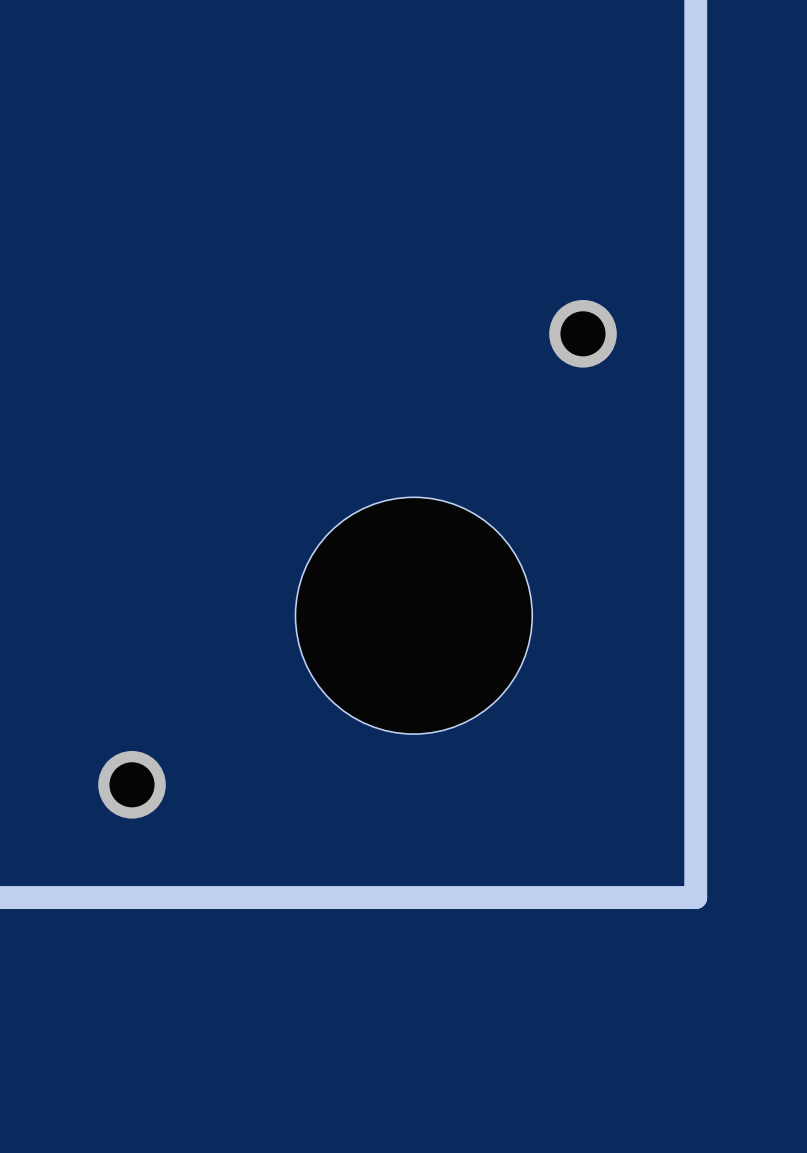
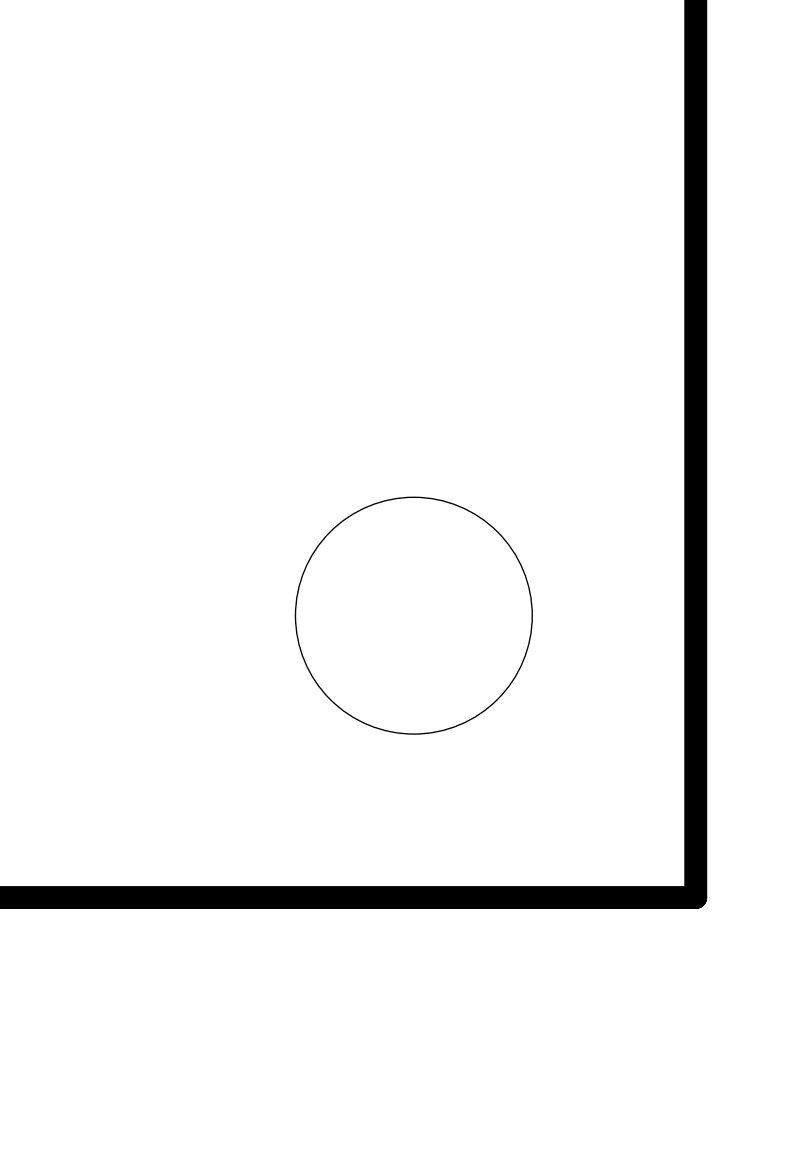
via: (582, 333) -> none
via: (132, 784) -> none

